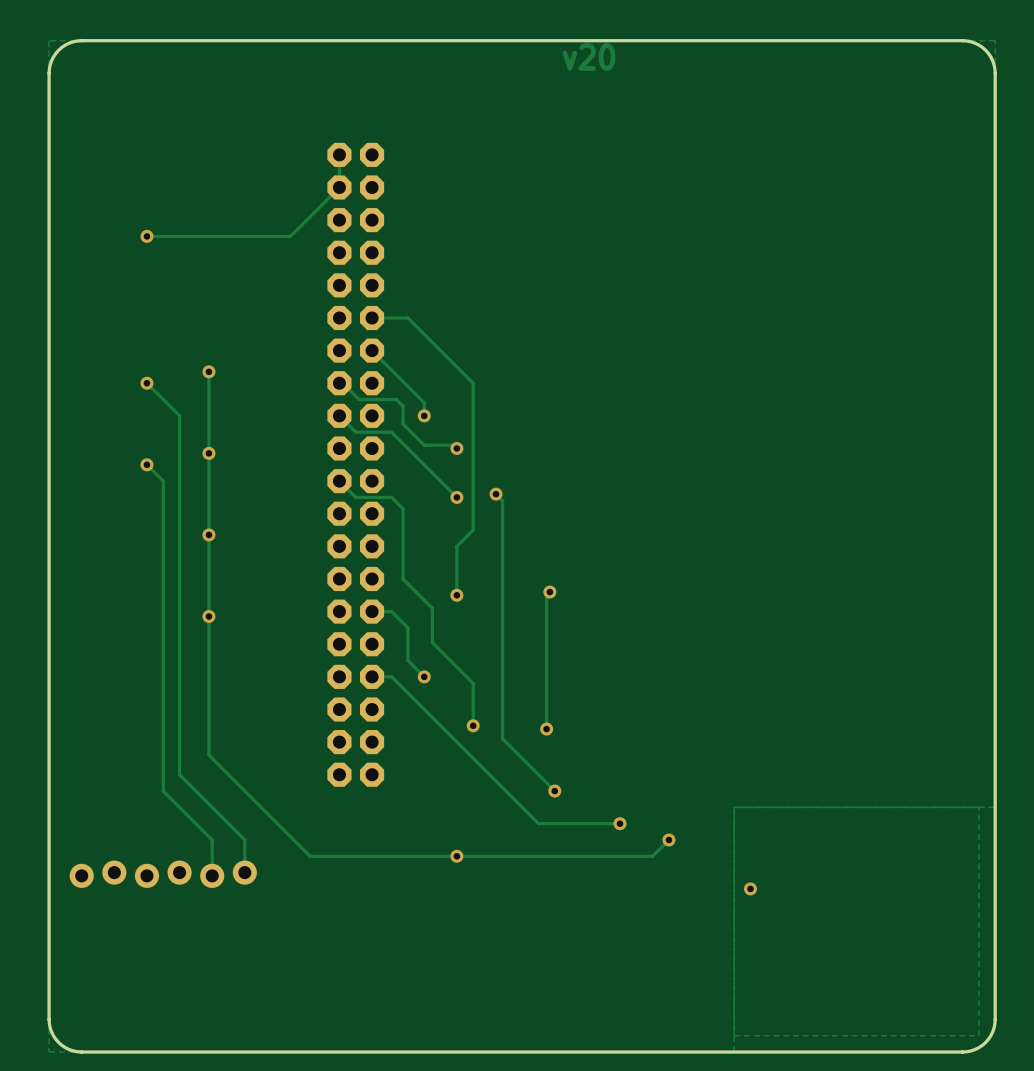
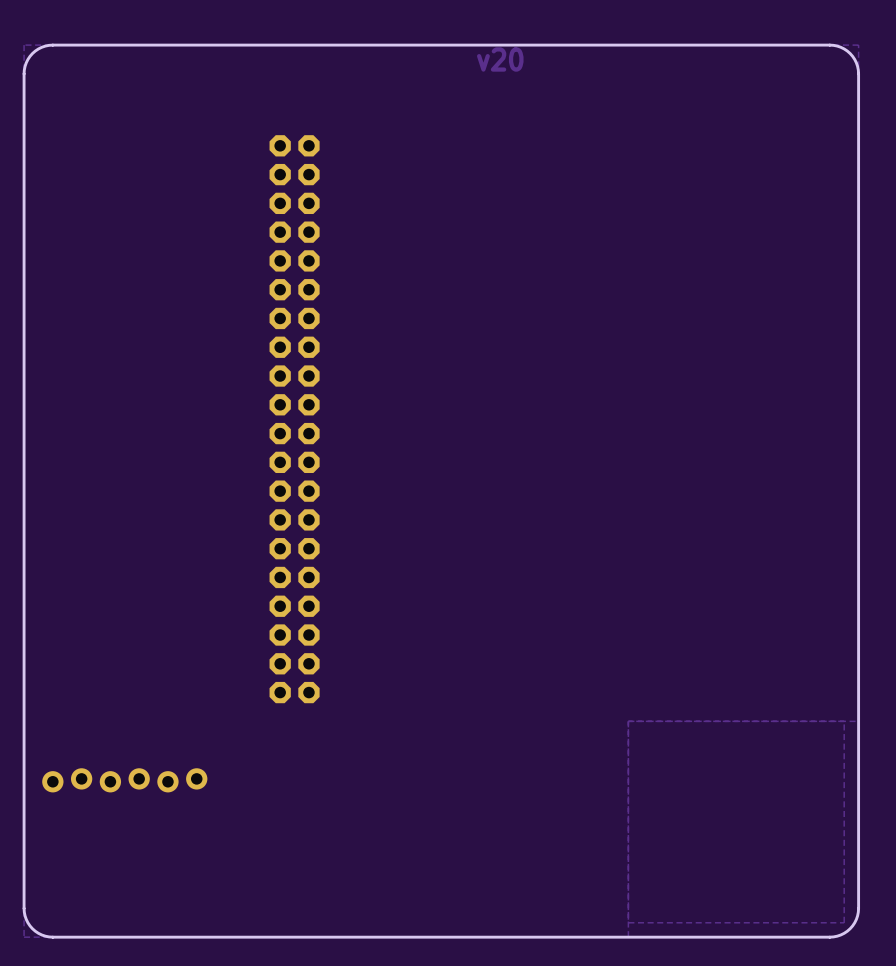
track: (339, 154) (339, 187) (290, 236) (146, 236) -> none
via: (146, 236) -> none
track: (372, 317) (407, 317) (473, 383) (473, 530) (456, 546) (456, 595) -> none
track: (372, 350) (424, 402) (424, 415) -> none
track: (208, 371) (208, 755) (310, 856) (652, 856) (668, 839) -> none
via: (208, 371) -> none
track: (146, 383) (179, 415) (179, 774) (244, 839) (244, 872) -> none
via: (146, 383) -> none
track: (339, 383) (342, 383) (359, 399) (396, 399) (403, 406) (403, 424) (424, 445) (453, 445) (456, 448) -> none
track: (339, 415) (355, 432) (391, 432) (456, 497) -> none
via: (424, 415) -> none
via: (456, 448) -> none
via: (208, 453) -> none
track: (146, 464) (163, 481) (163, 791) (212, 839) (212, 875) -> none
via: (146, 464) -> none
track: (339, 481) (355, 497) (391, 497) (403, 508) (403, 578) (432, 608) (432, 642) (473, 683) (473, 725) -> none
track: (496, 494) (502, 500) (502, 738) (554, 791) -> none
via: (496, 494) -> none
via: (456, 497) -> none
via: (208, 534) -> none
track: (549, 592) (546, 595) (546, 729) -> none
via: (549, 592) -> none
via: (456, 595) -> none
track: (372, 611) (391, 611) (407, 627) (407, 660) (424, 676) -> none
via: (208, 616) -> none
track: (372, 676) (391, 676) (538, 823) (620, 823) -> none
via: (424, 676) -> none
via: (473, 725) -> none
via: (546, 729) -> none
via: (554, 791) -> none
via: (620, 823) -> none
via: (668, 839) -> none
via: (456, 856) -> none
via: (750, 888) -> none

